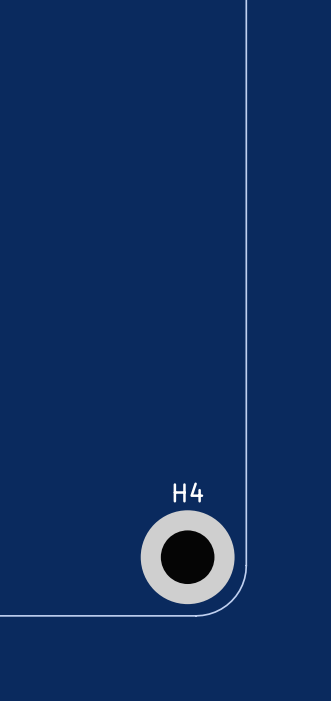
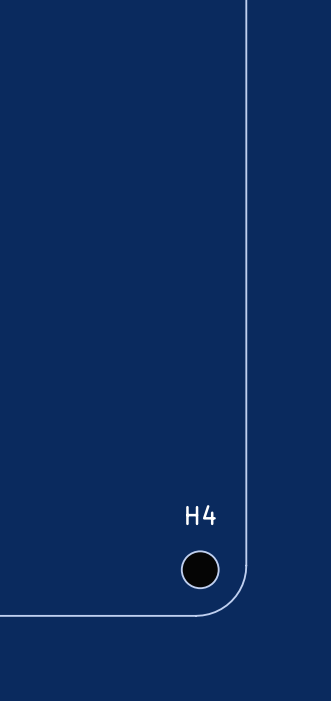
H4 footprint: [140, 510, 235, 605] -> [181, 551, 219, 589]

